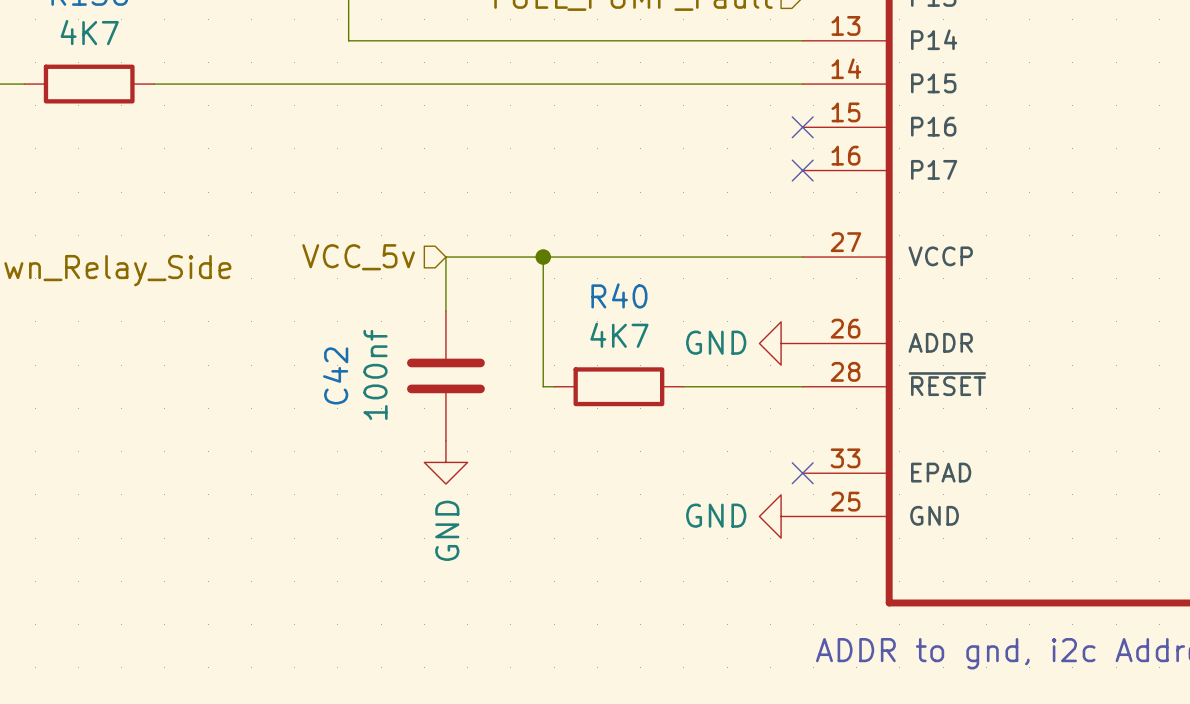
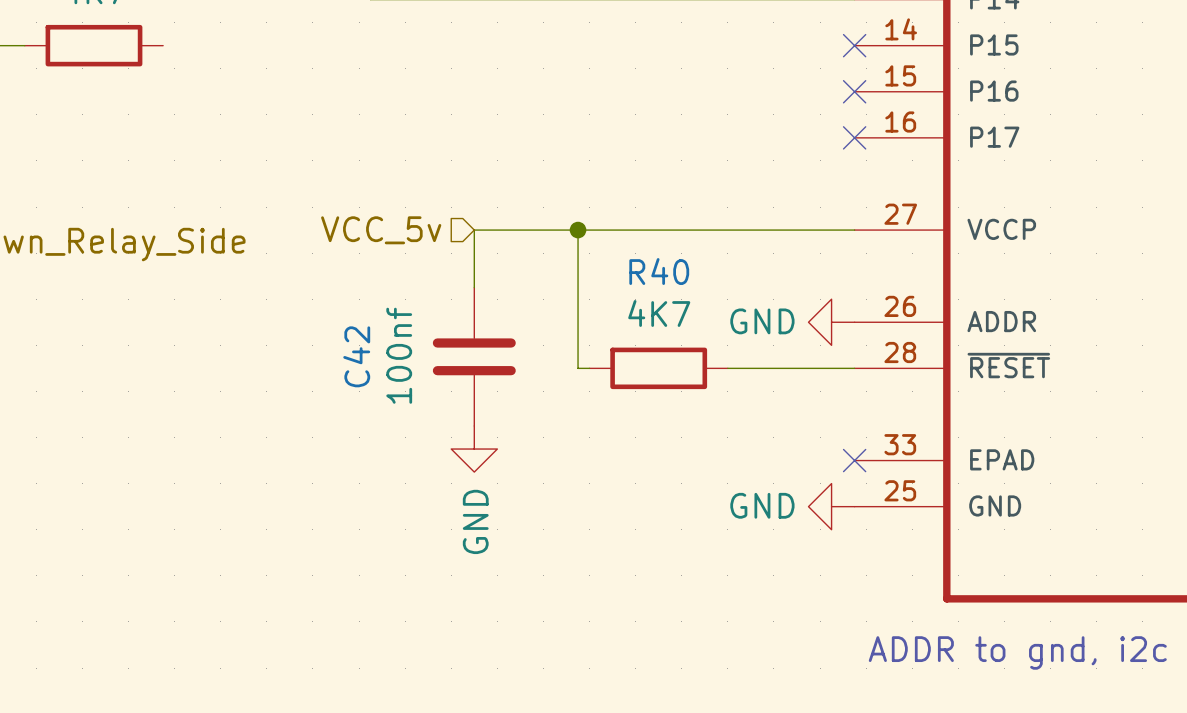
wire: (154, 84) (802, 84) -> none
no-connect mark: none -> (854, 45)

